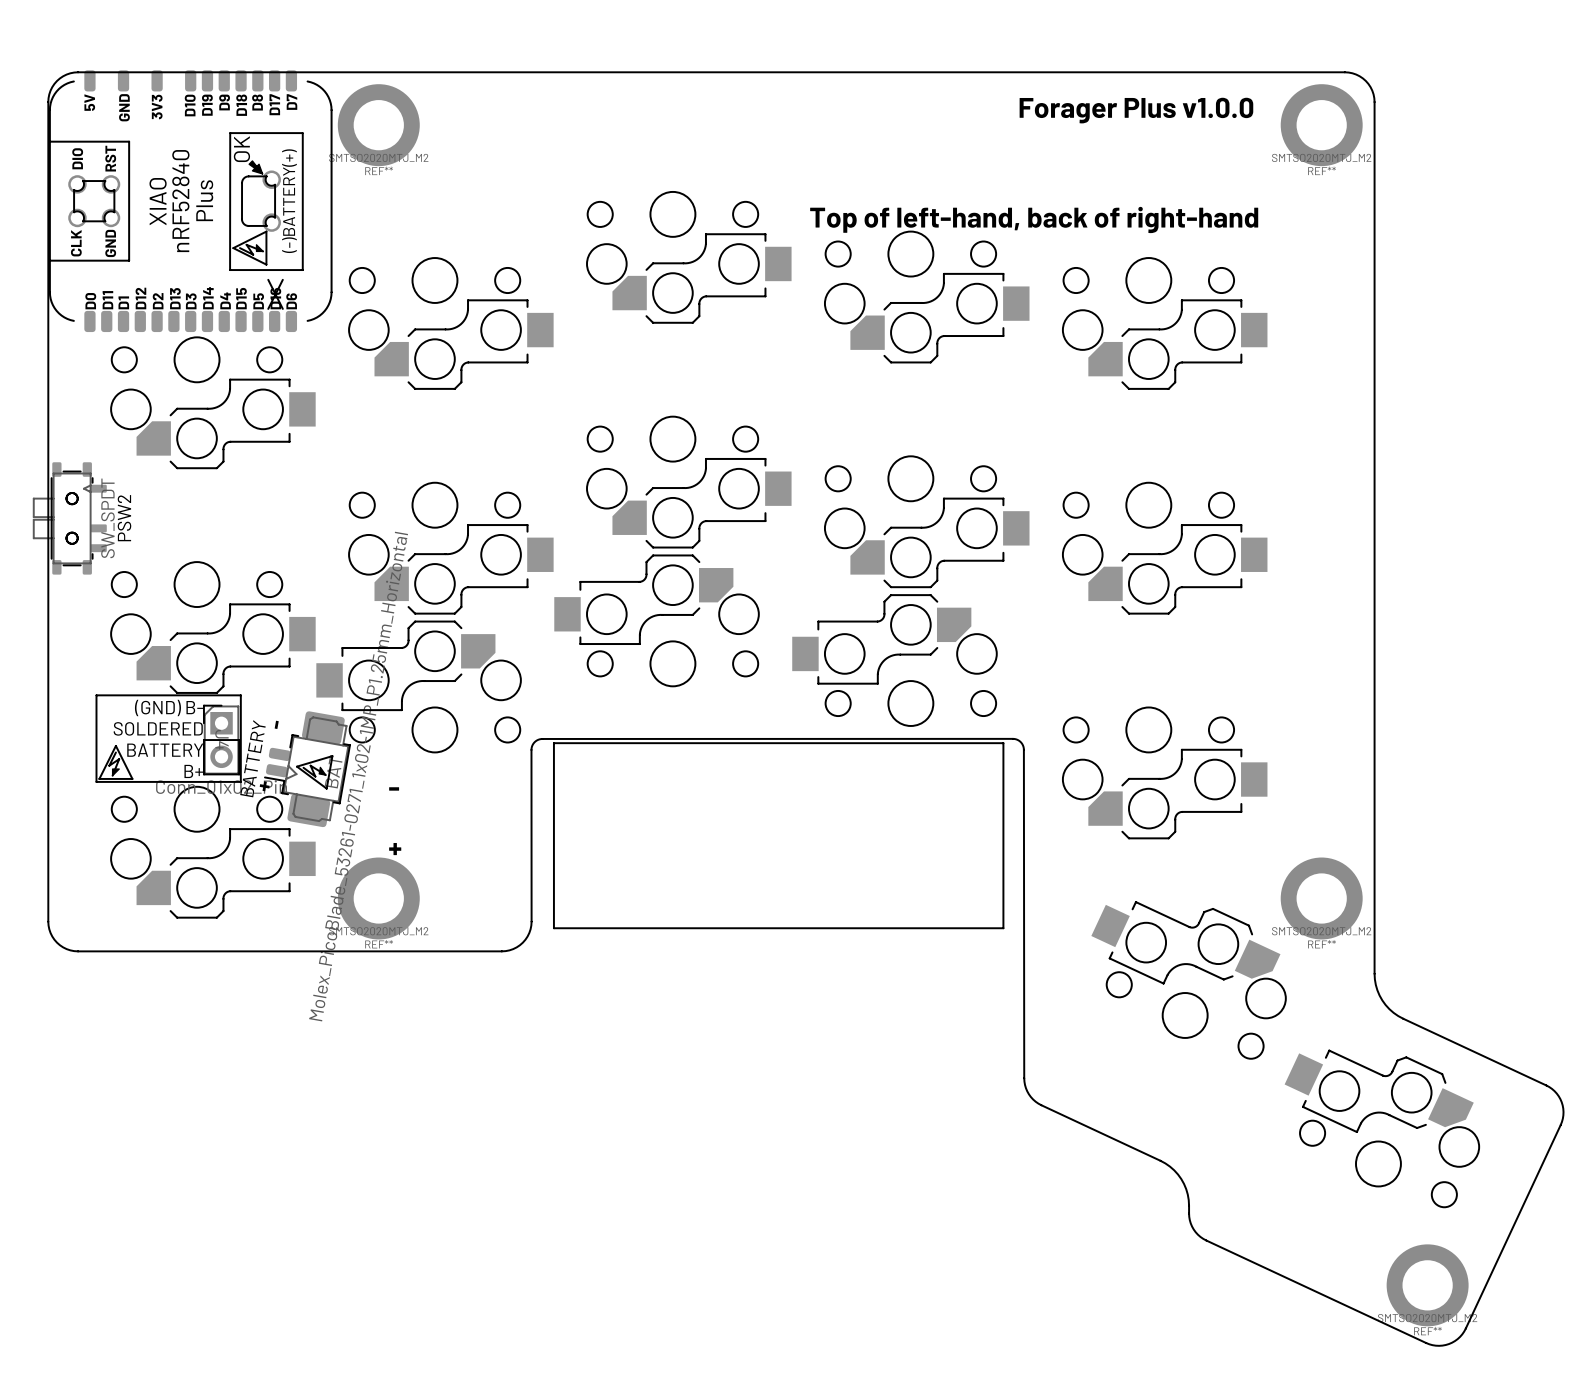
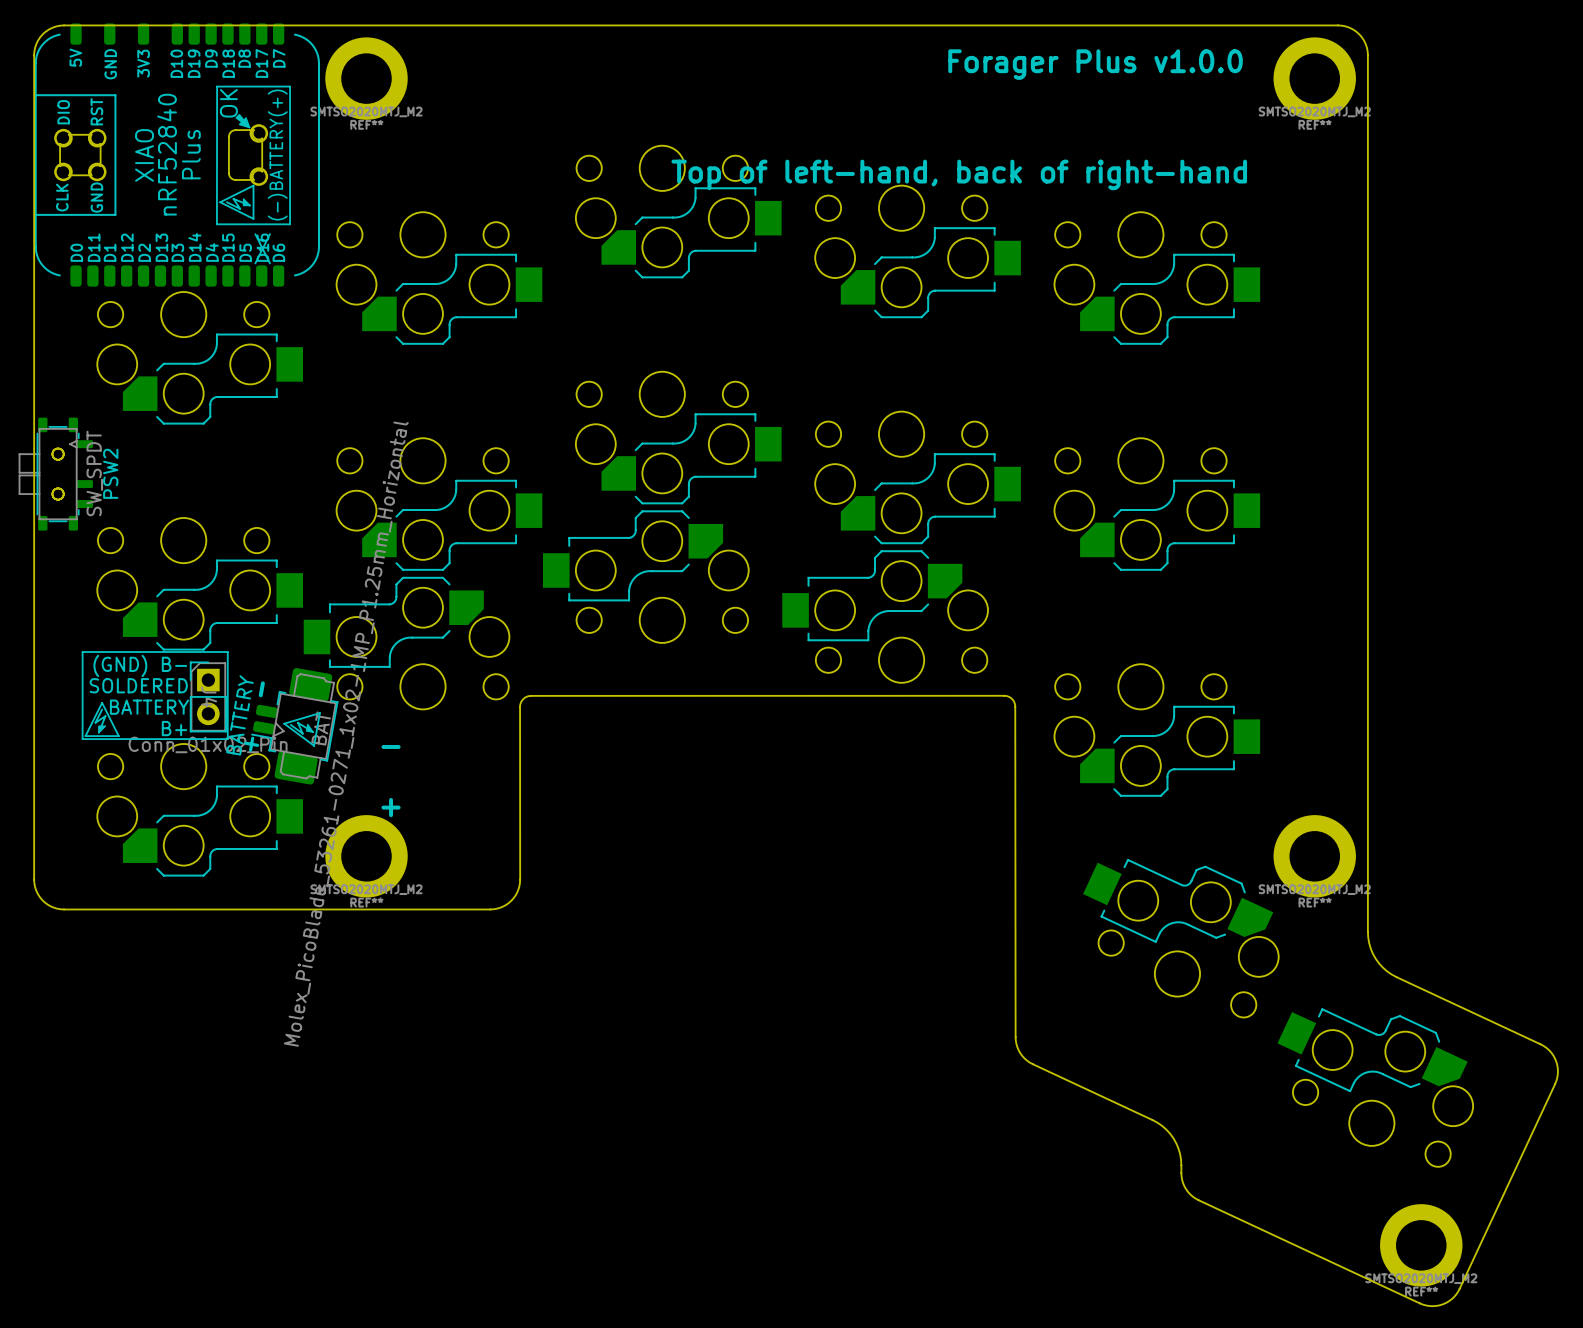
line: (1003, 743) (553, 743) (553, 928) (1003, 928) (1003, 743) -> none

